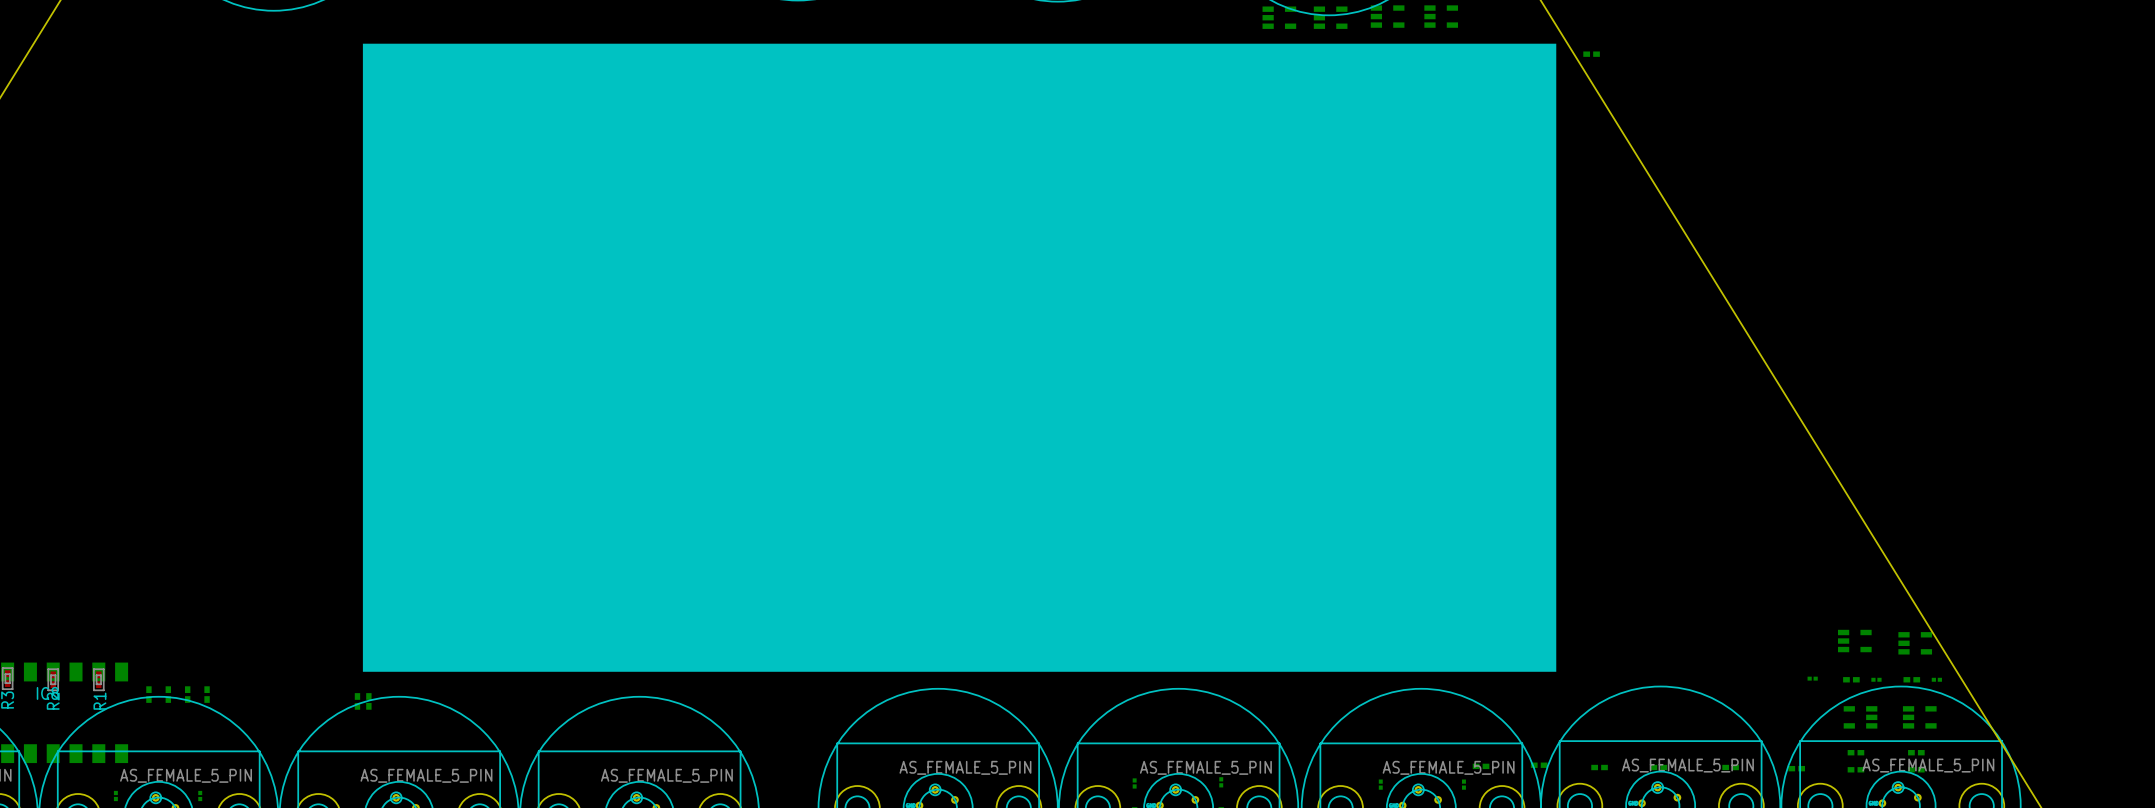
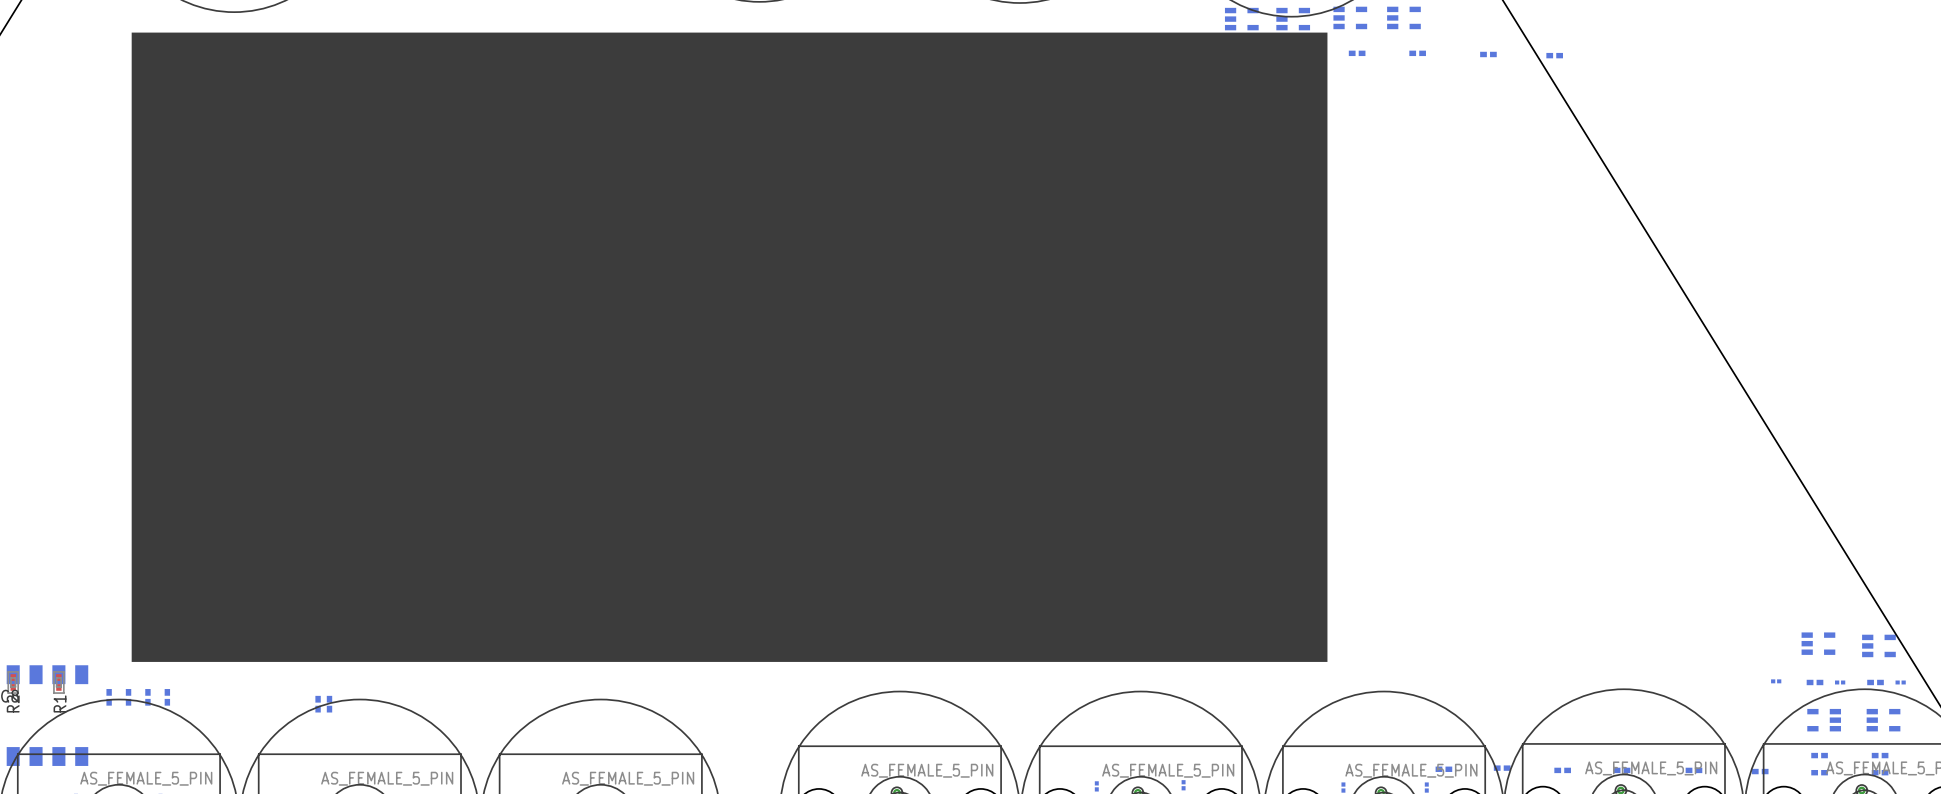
drawing position: (959, 357) -> (729, 347)

